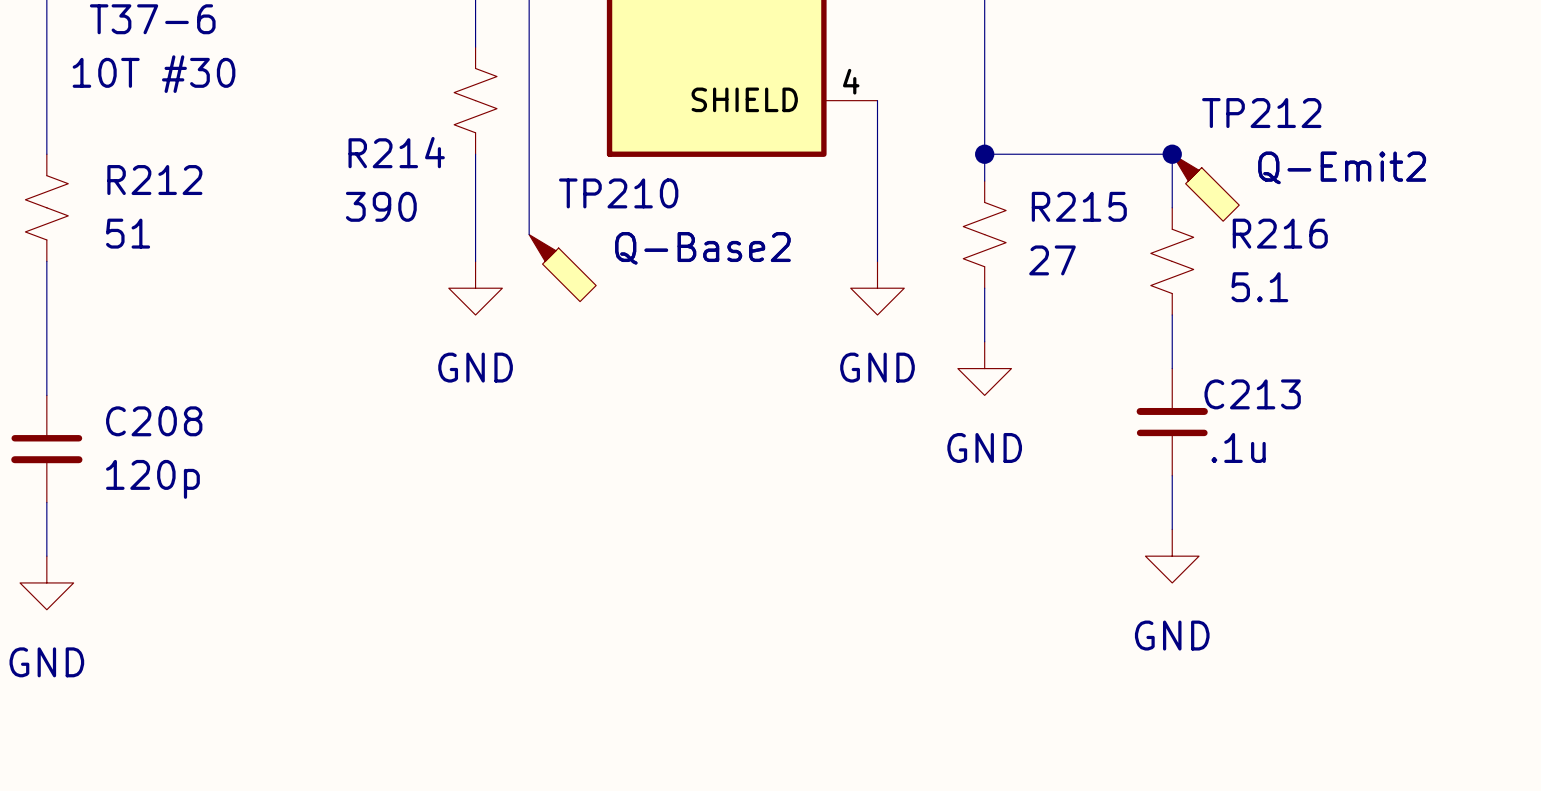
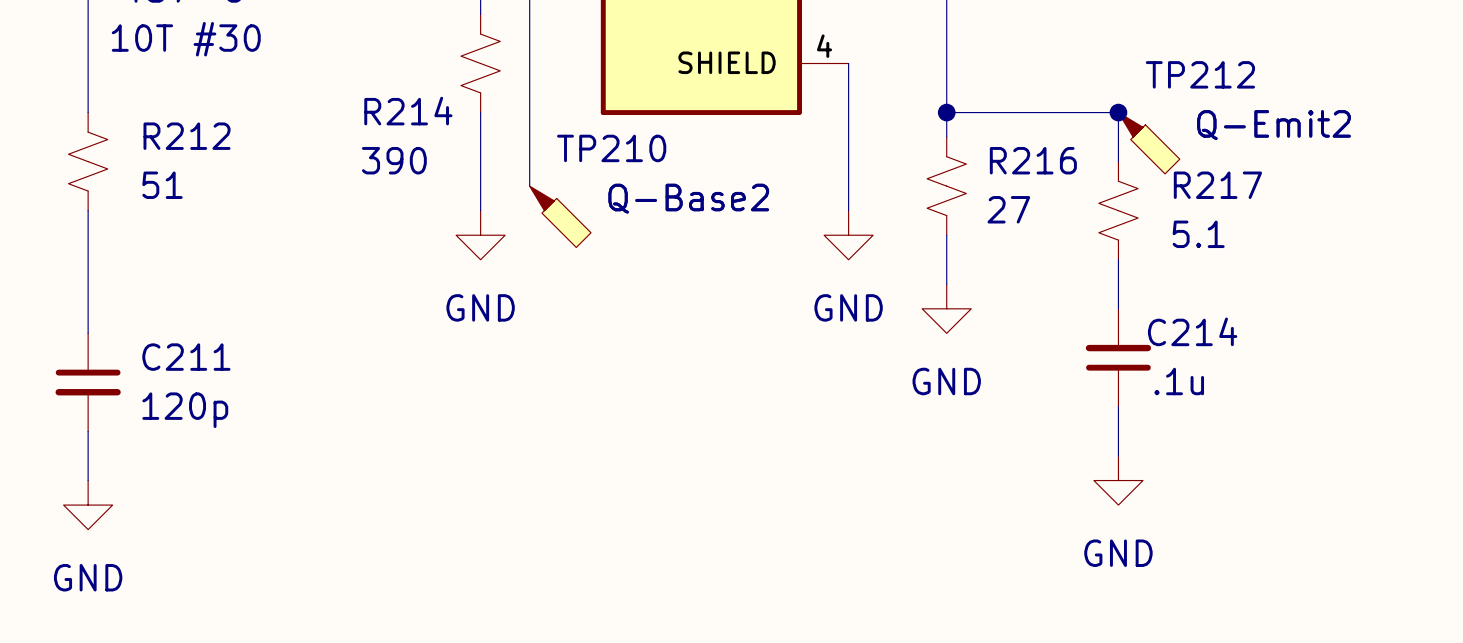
R215 name: R215 (1079, 206) -> R216 (1033, 160)
R216 name: R216 (1280, 233) -> R217 (1217, 185)
C213 name: C213 (1252, 394) -> C214 (1192, 331)
C208 name: C208 (154, 421) -> C211 (186, 357)

